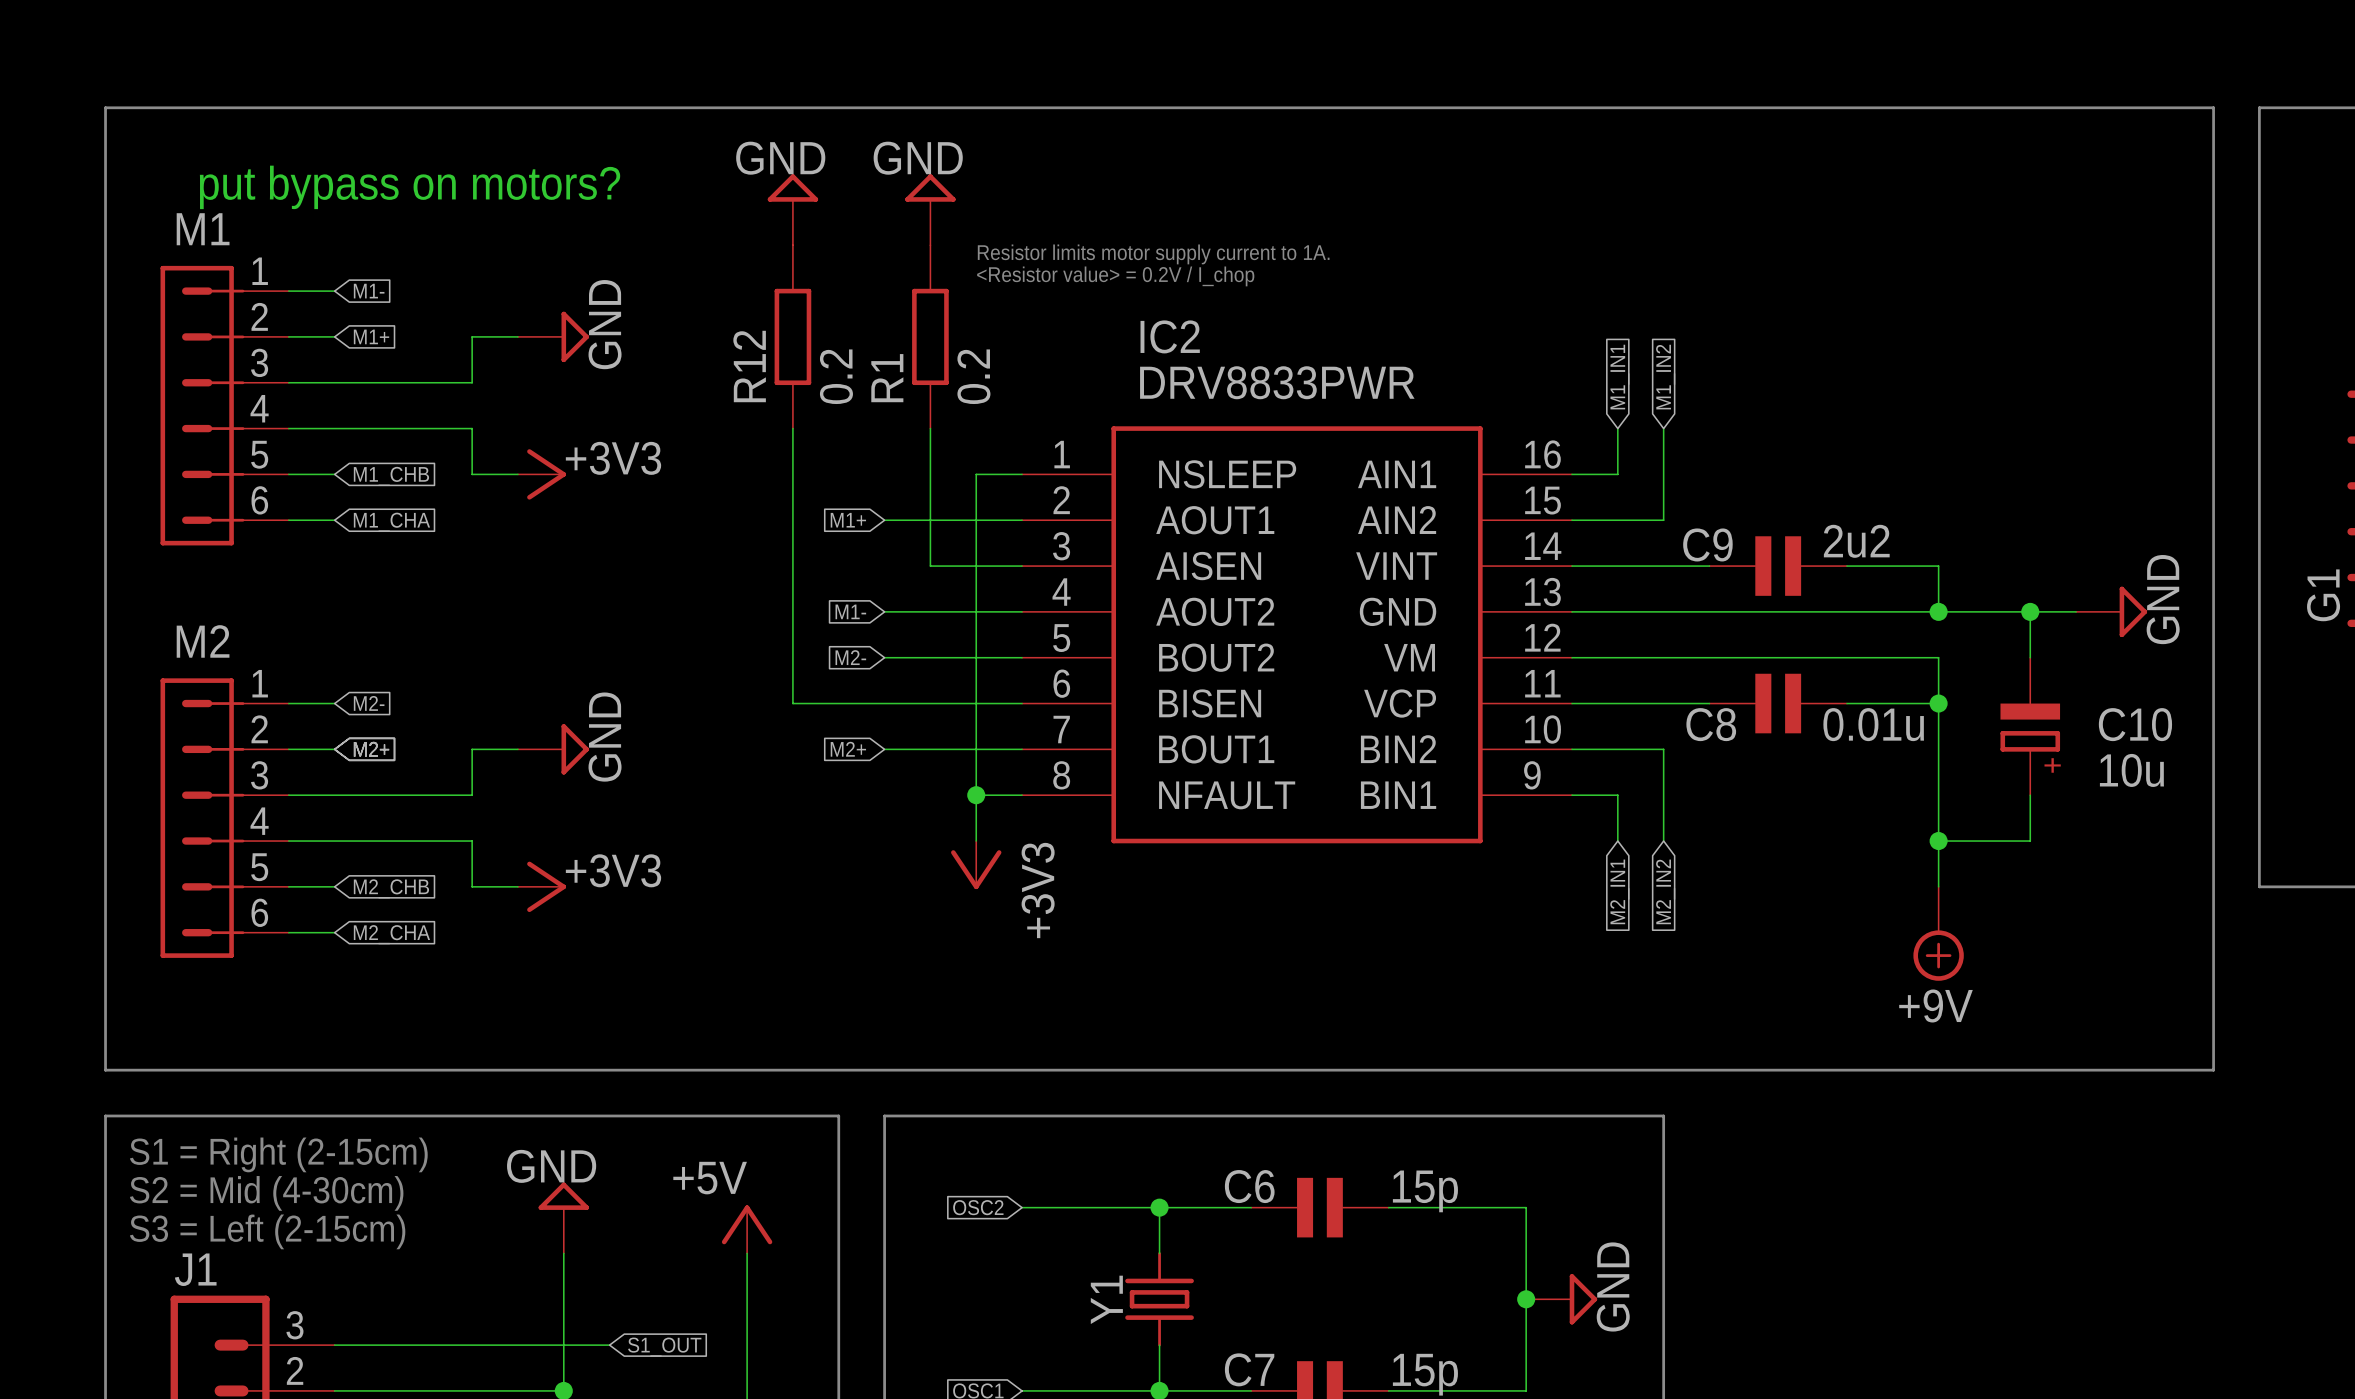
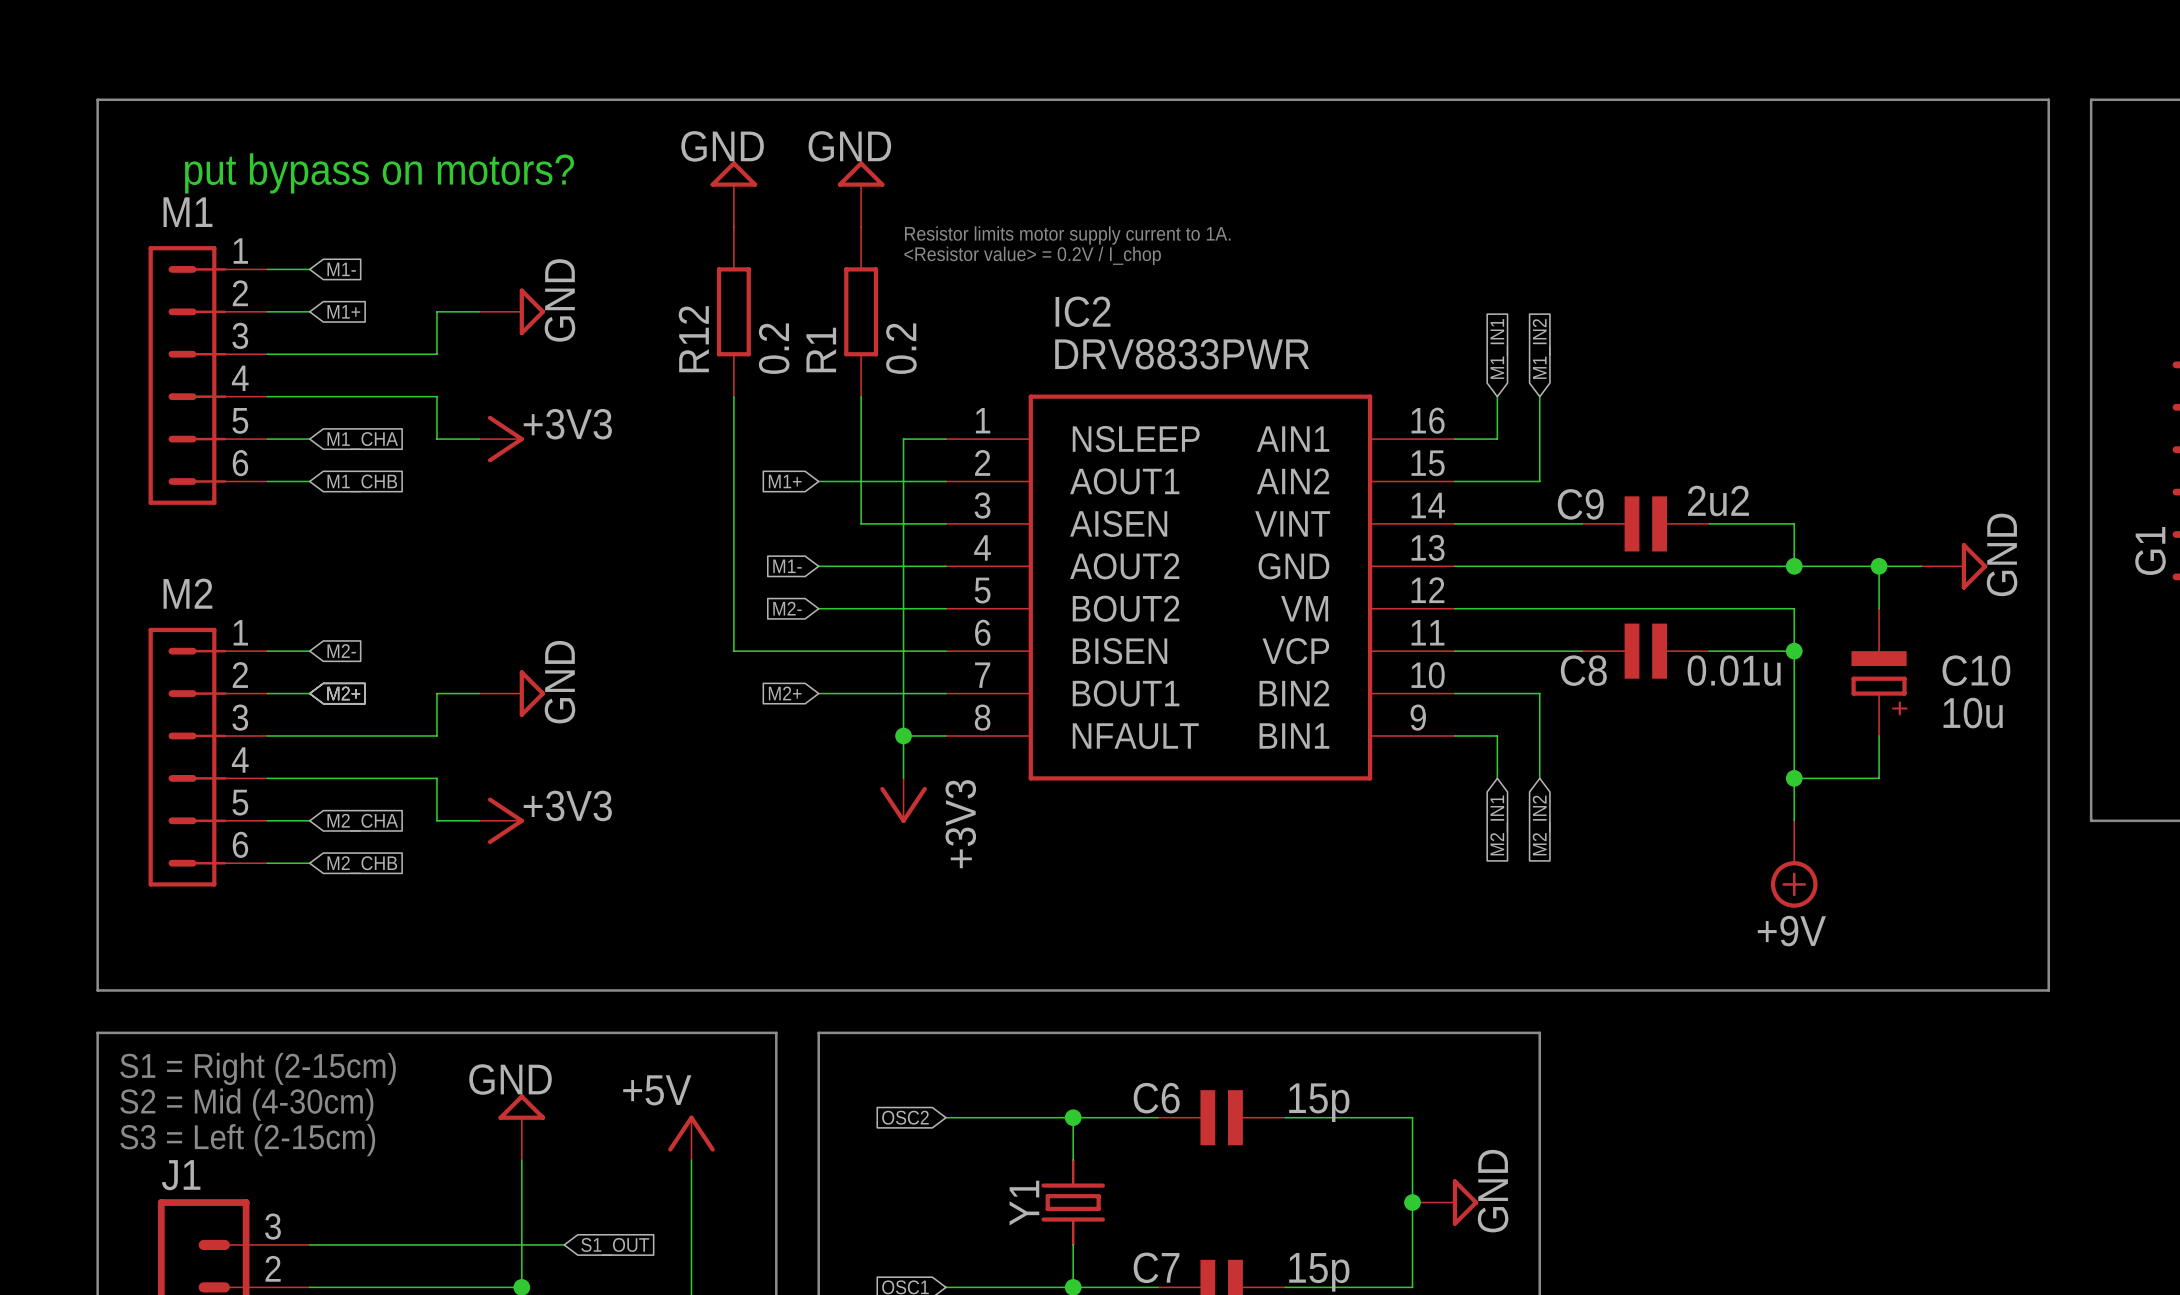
global label: M1_CHB (391, 476) -> M1_CHA (362, 440)
global label: M1_CHA (391, 522) -> M1_CHB (362, 483)
global label: M2_CHB (391, 888) -> M2_CHA (362, 822)
global label: M2_CHA (391, 934) -> M2_CHB (362, 865)

